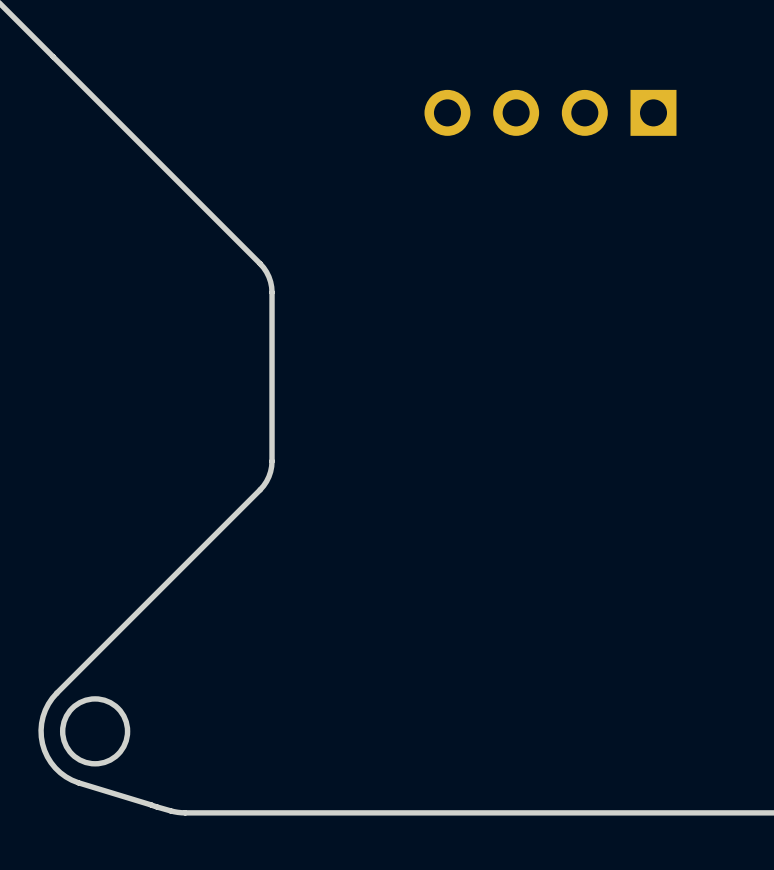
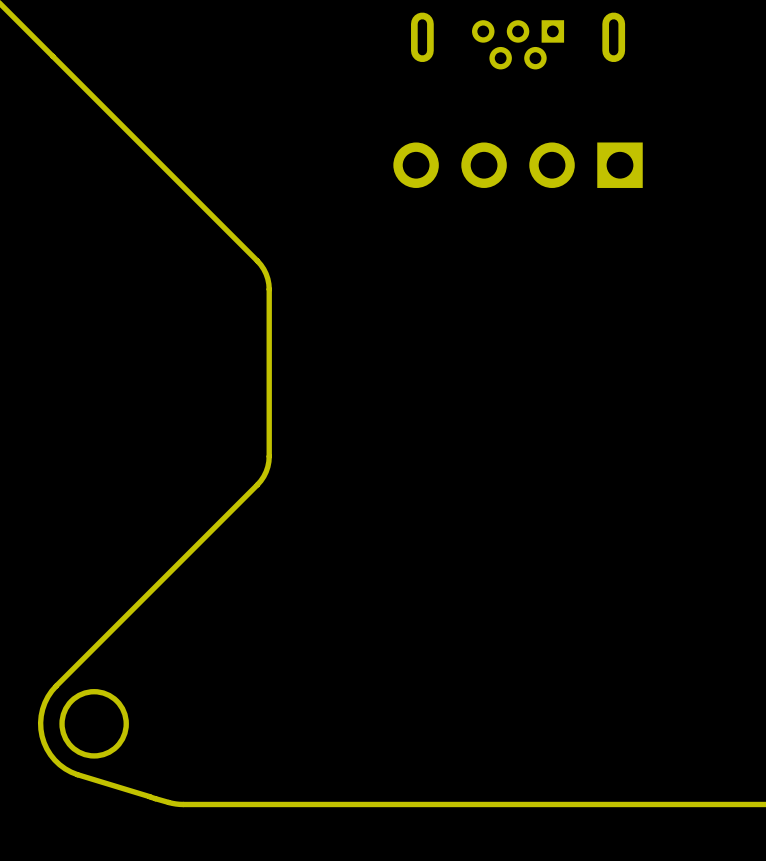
part: none -> (518, 41)
part position: (550, 112) -> (518, 165)

